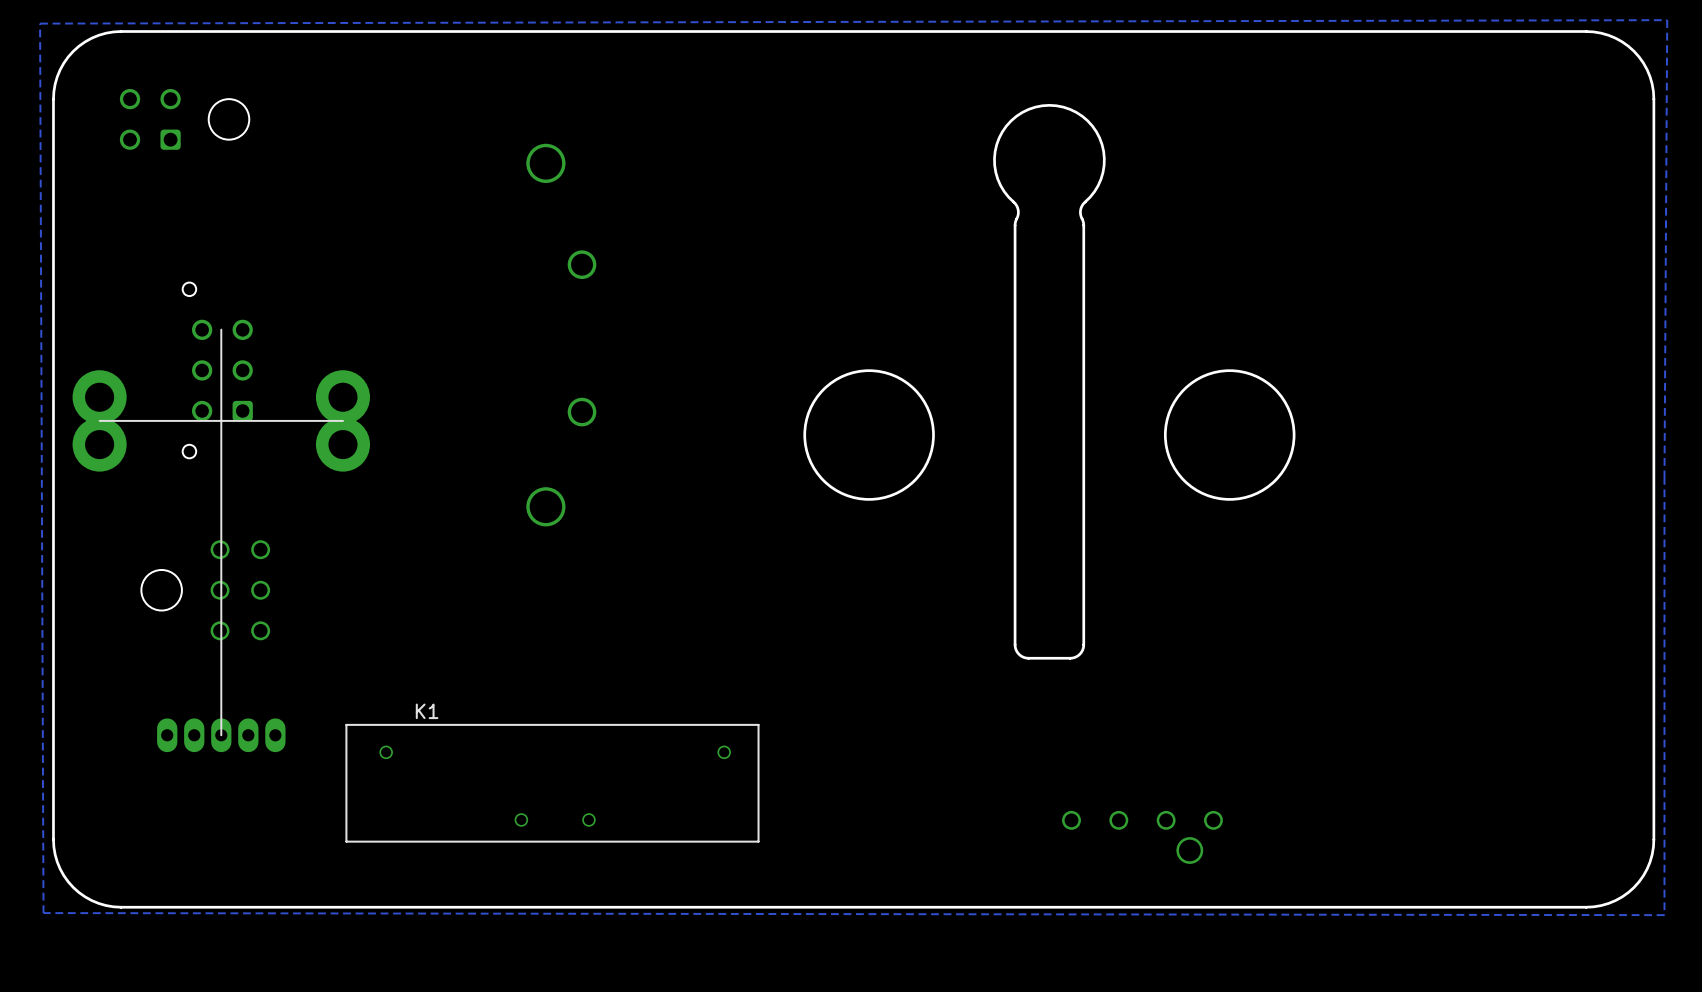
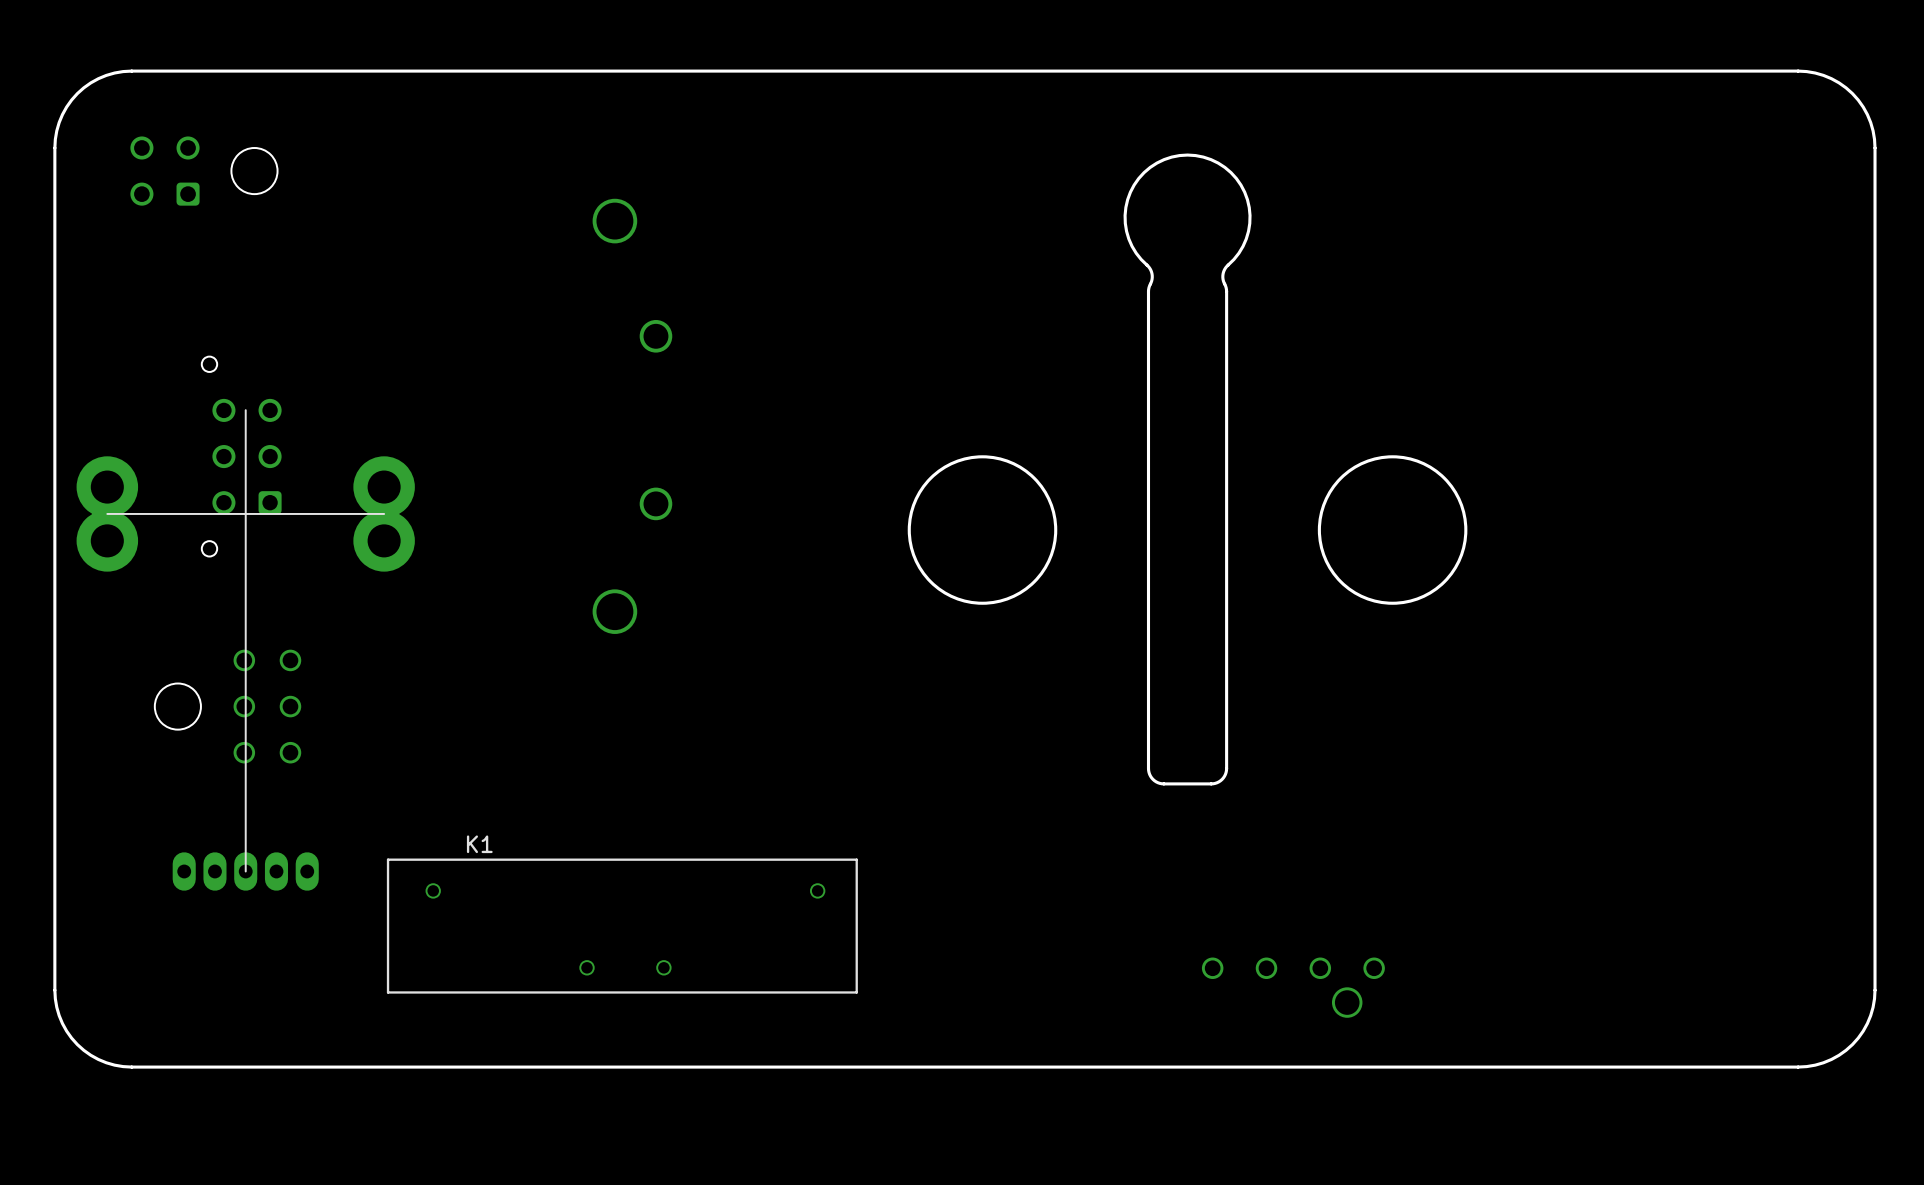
zone outline: (1667, 20) (40, 23) (43, 913) (1664, 915) (1667, 20) -> none

